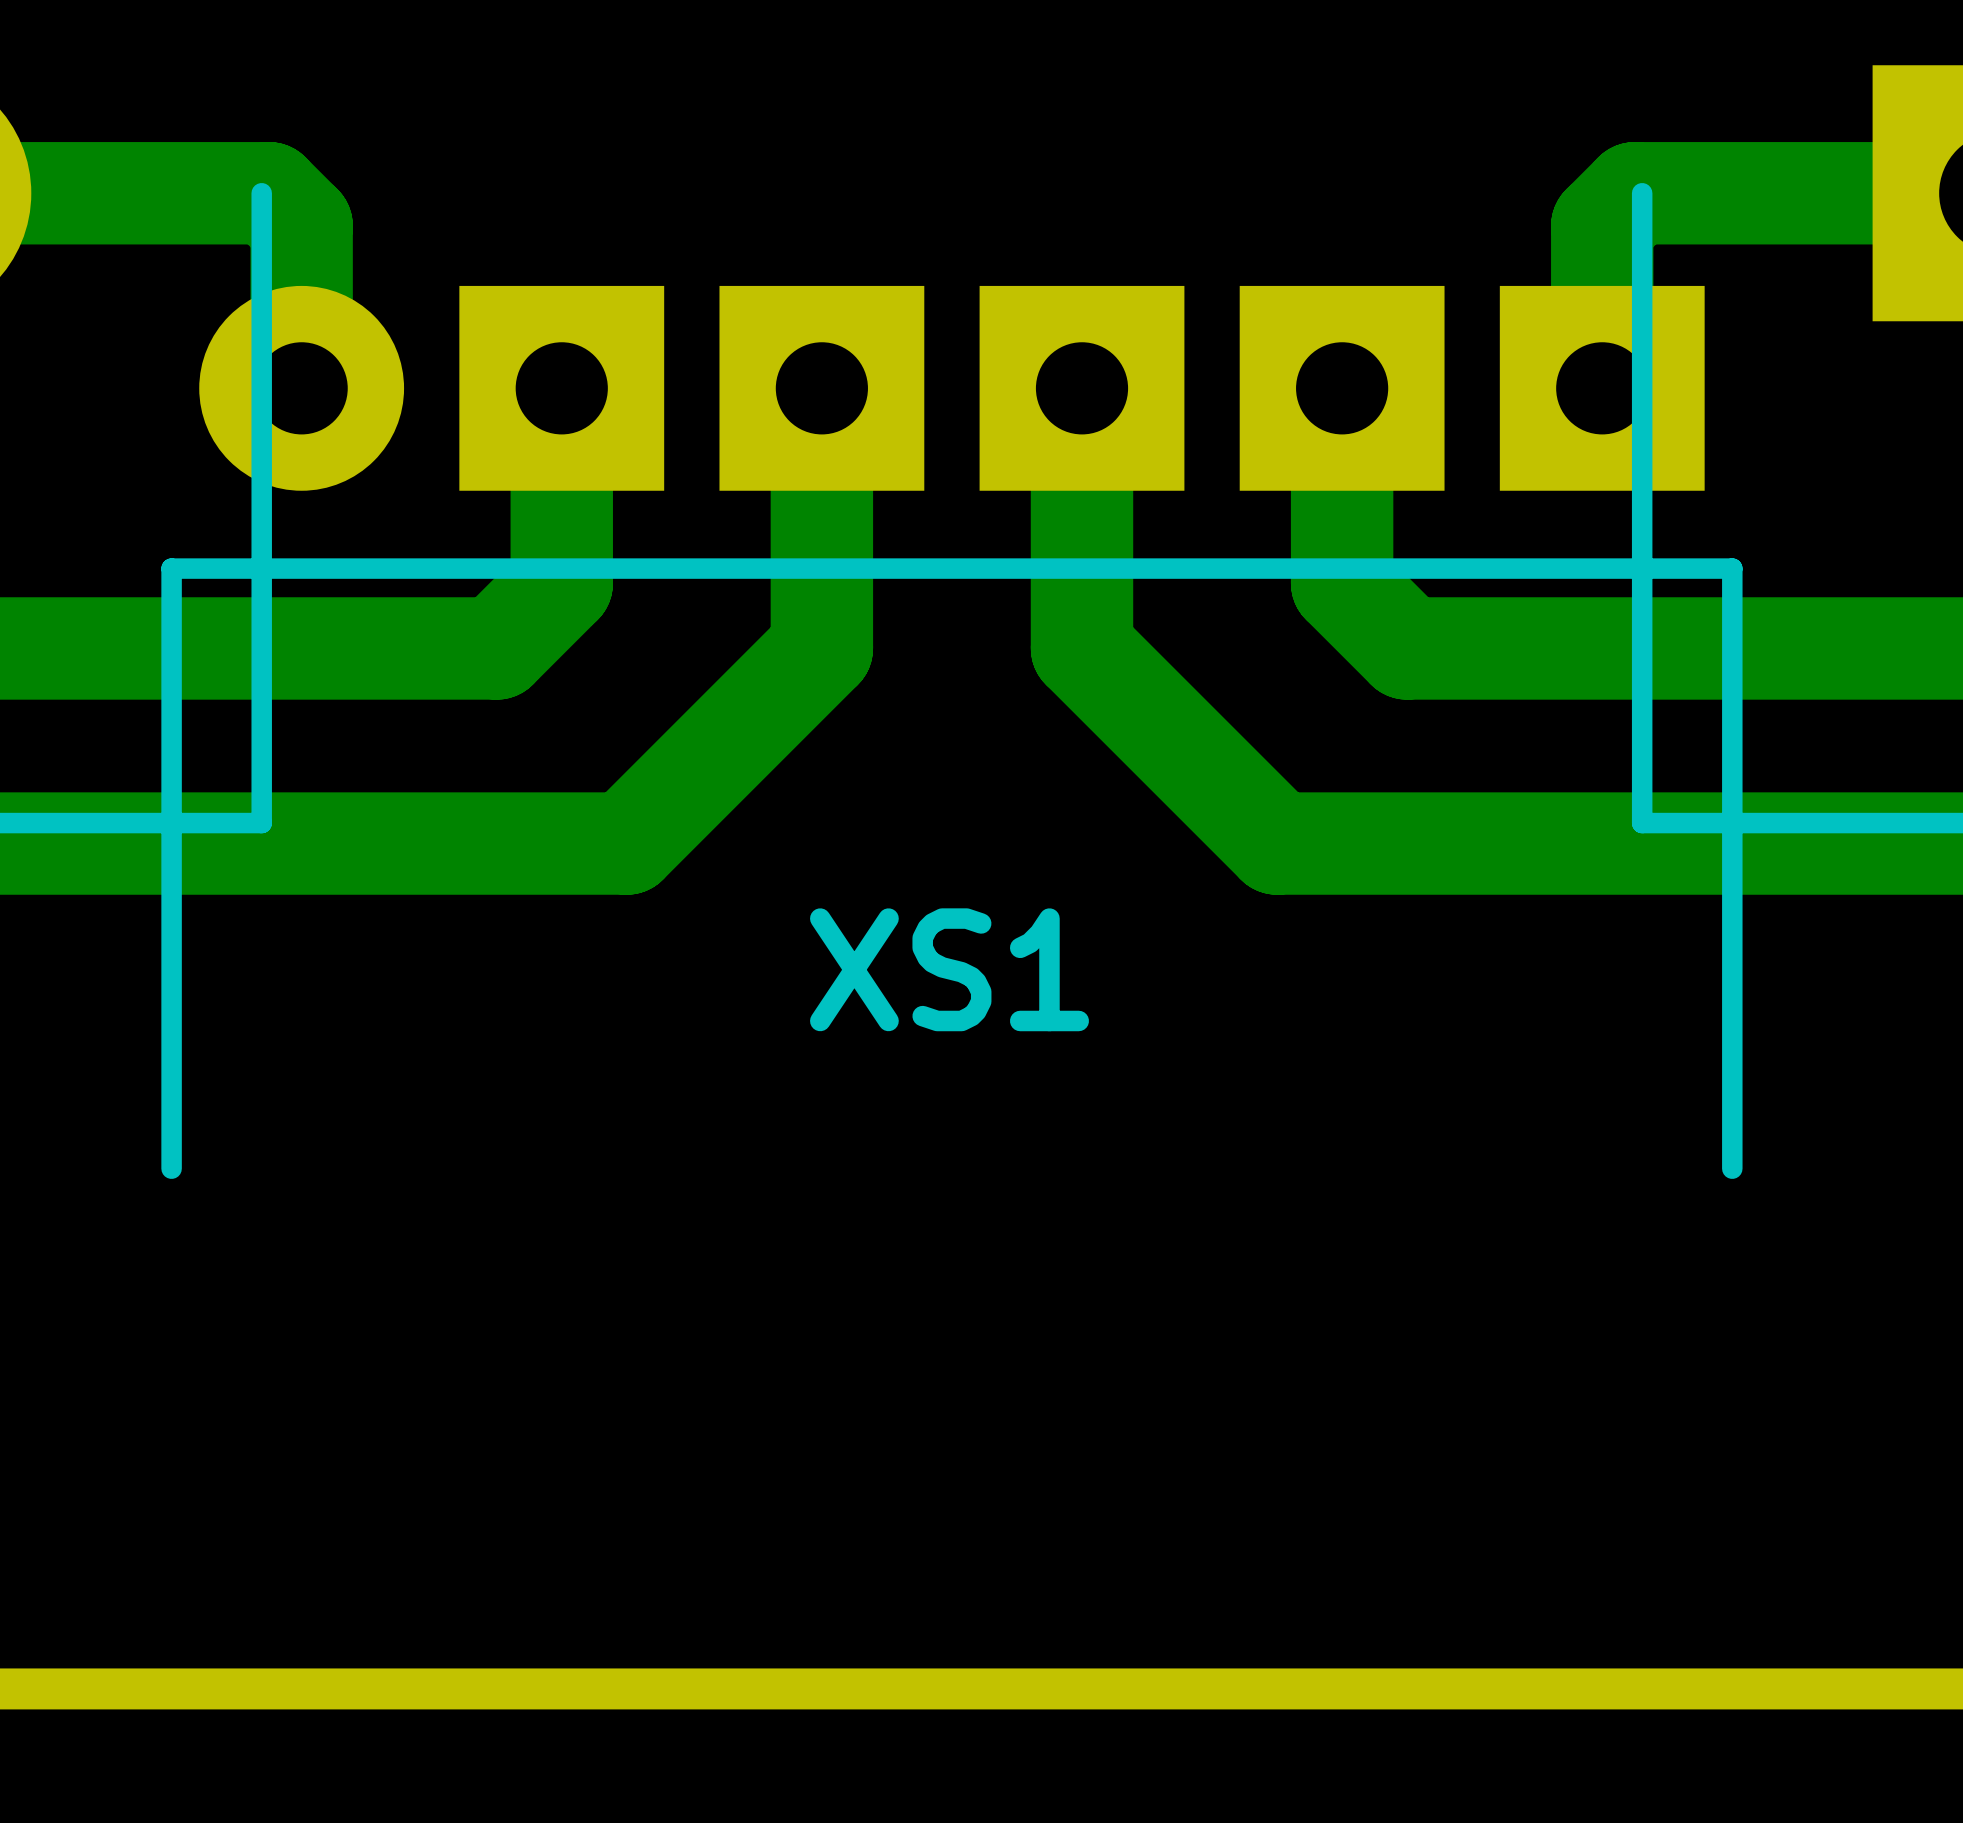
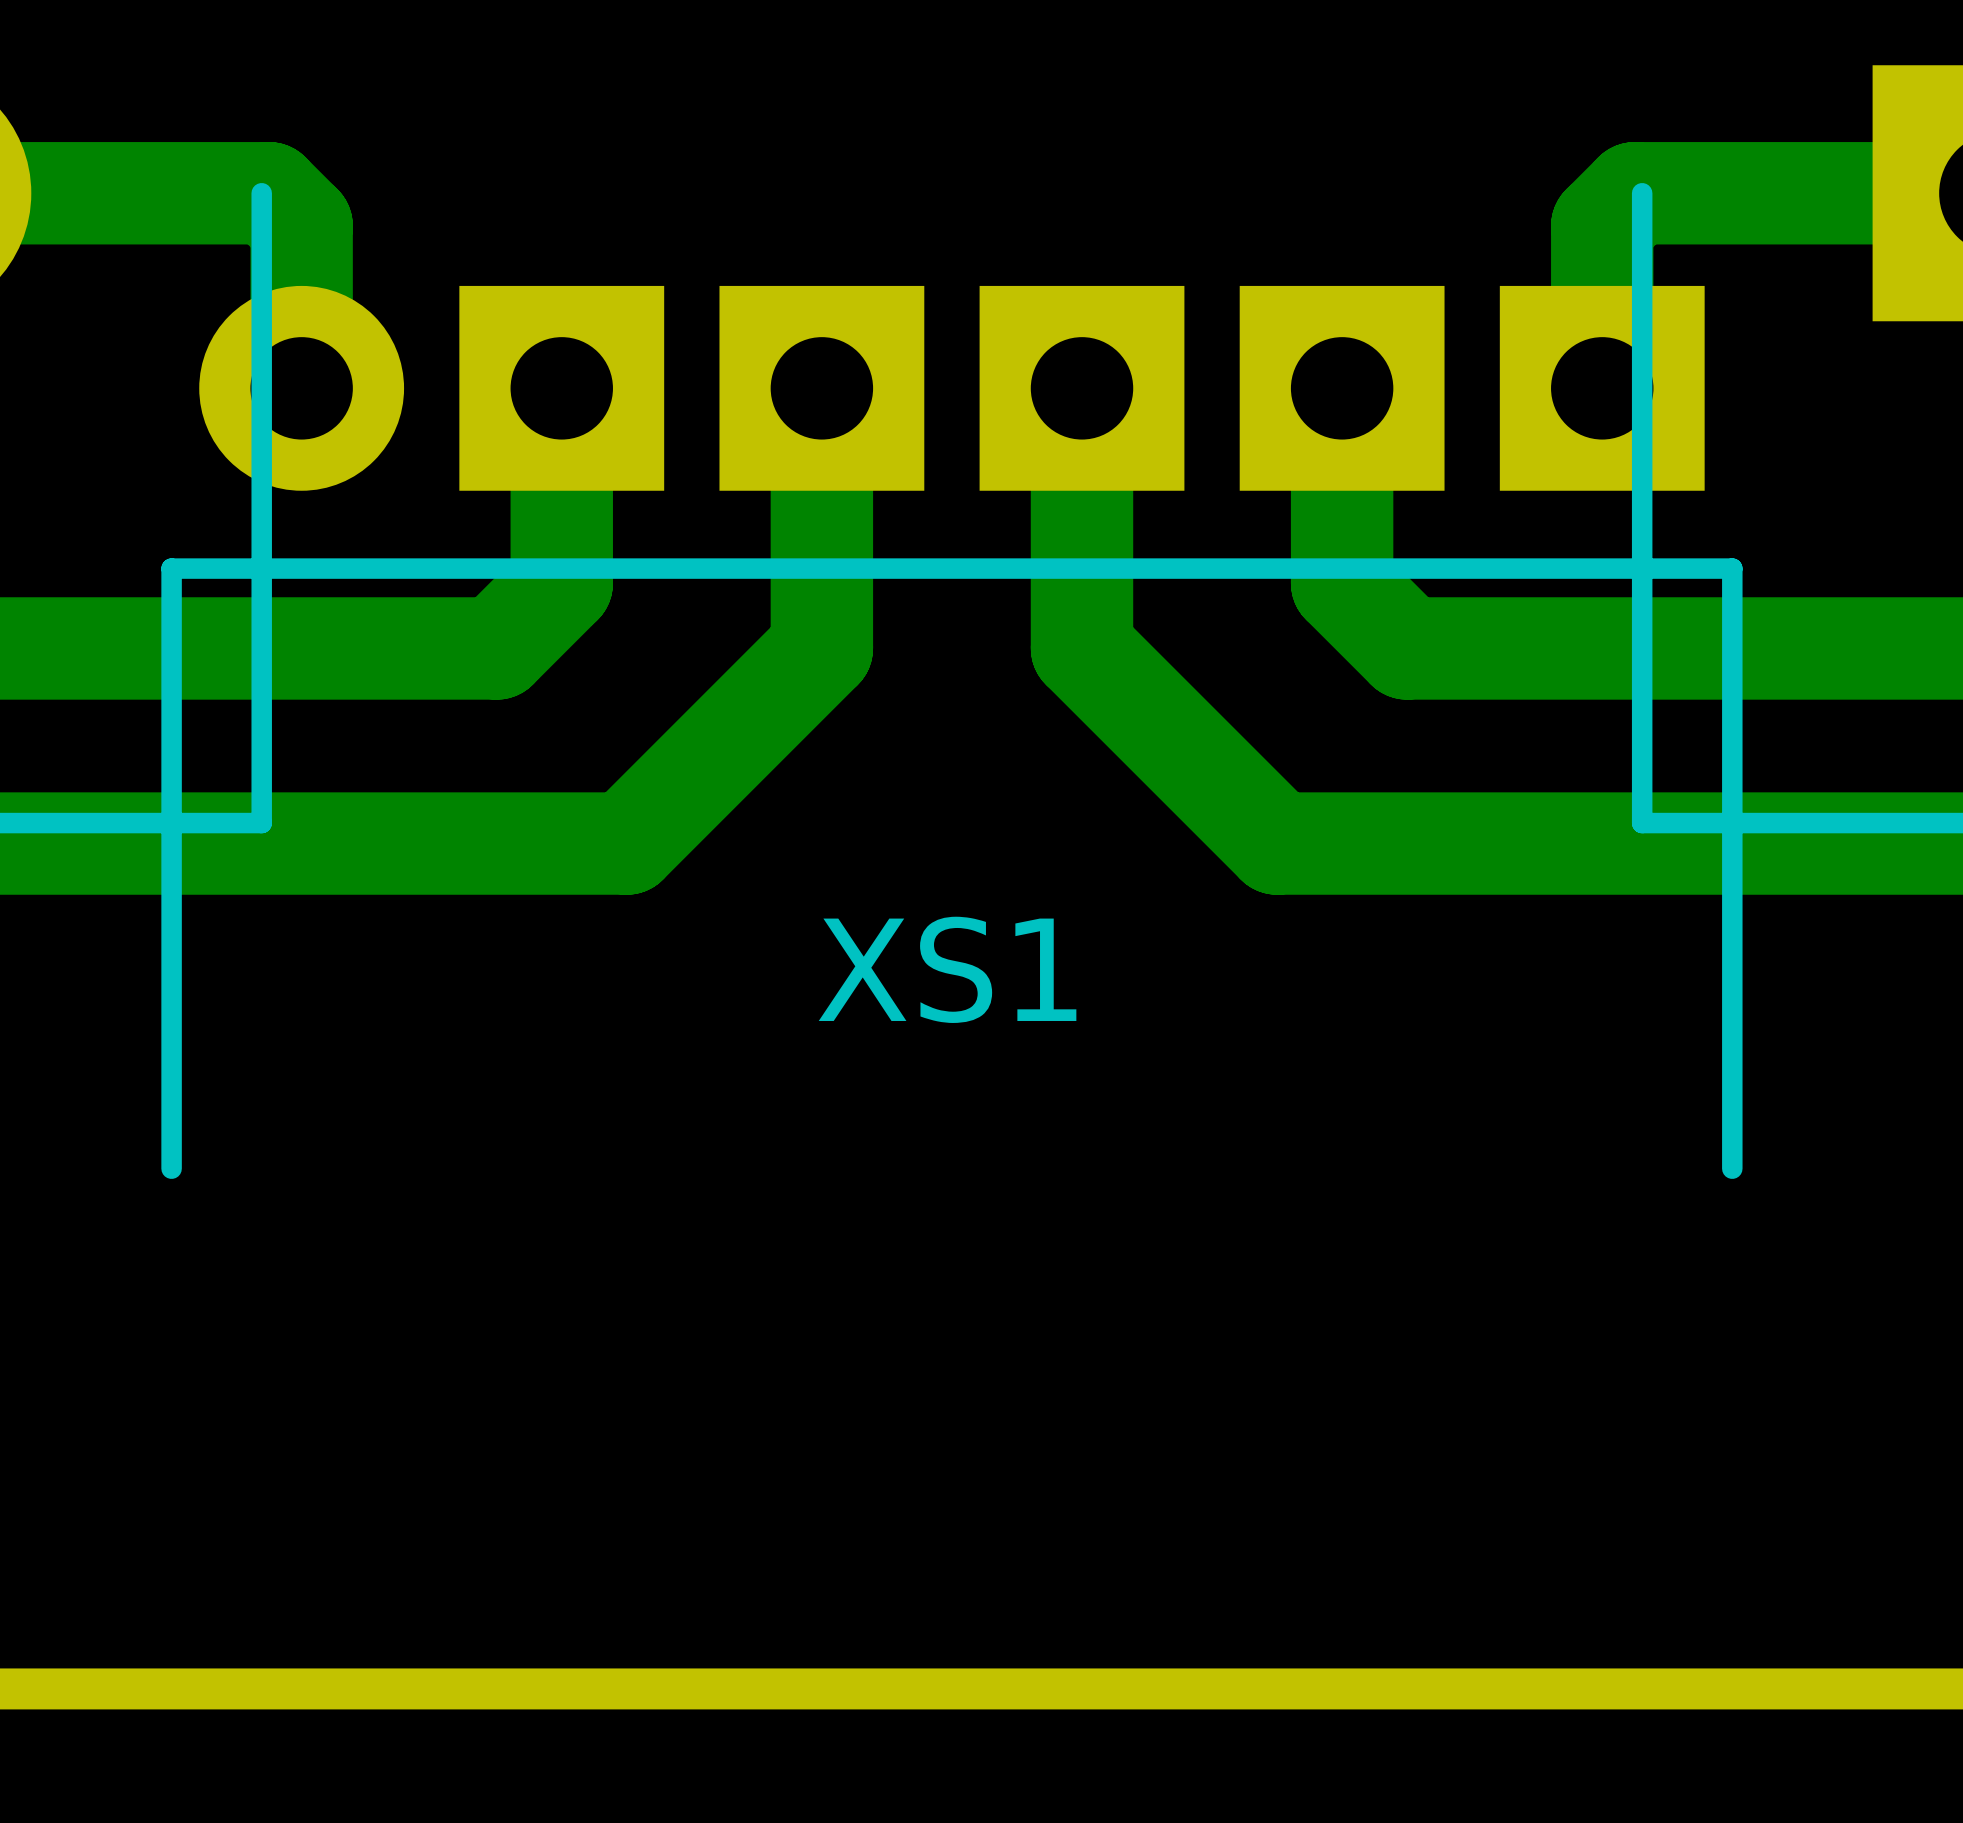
XS1 footprint: [161, 285, 1743, 1179] -> [161, 285, 1743, 1179]

